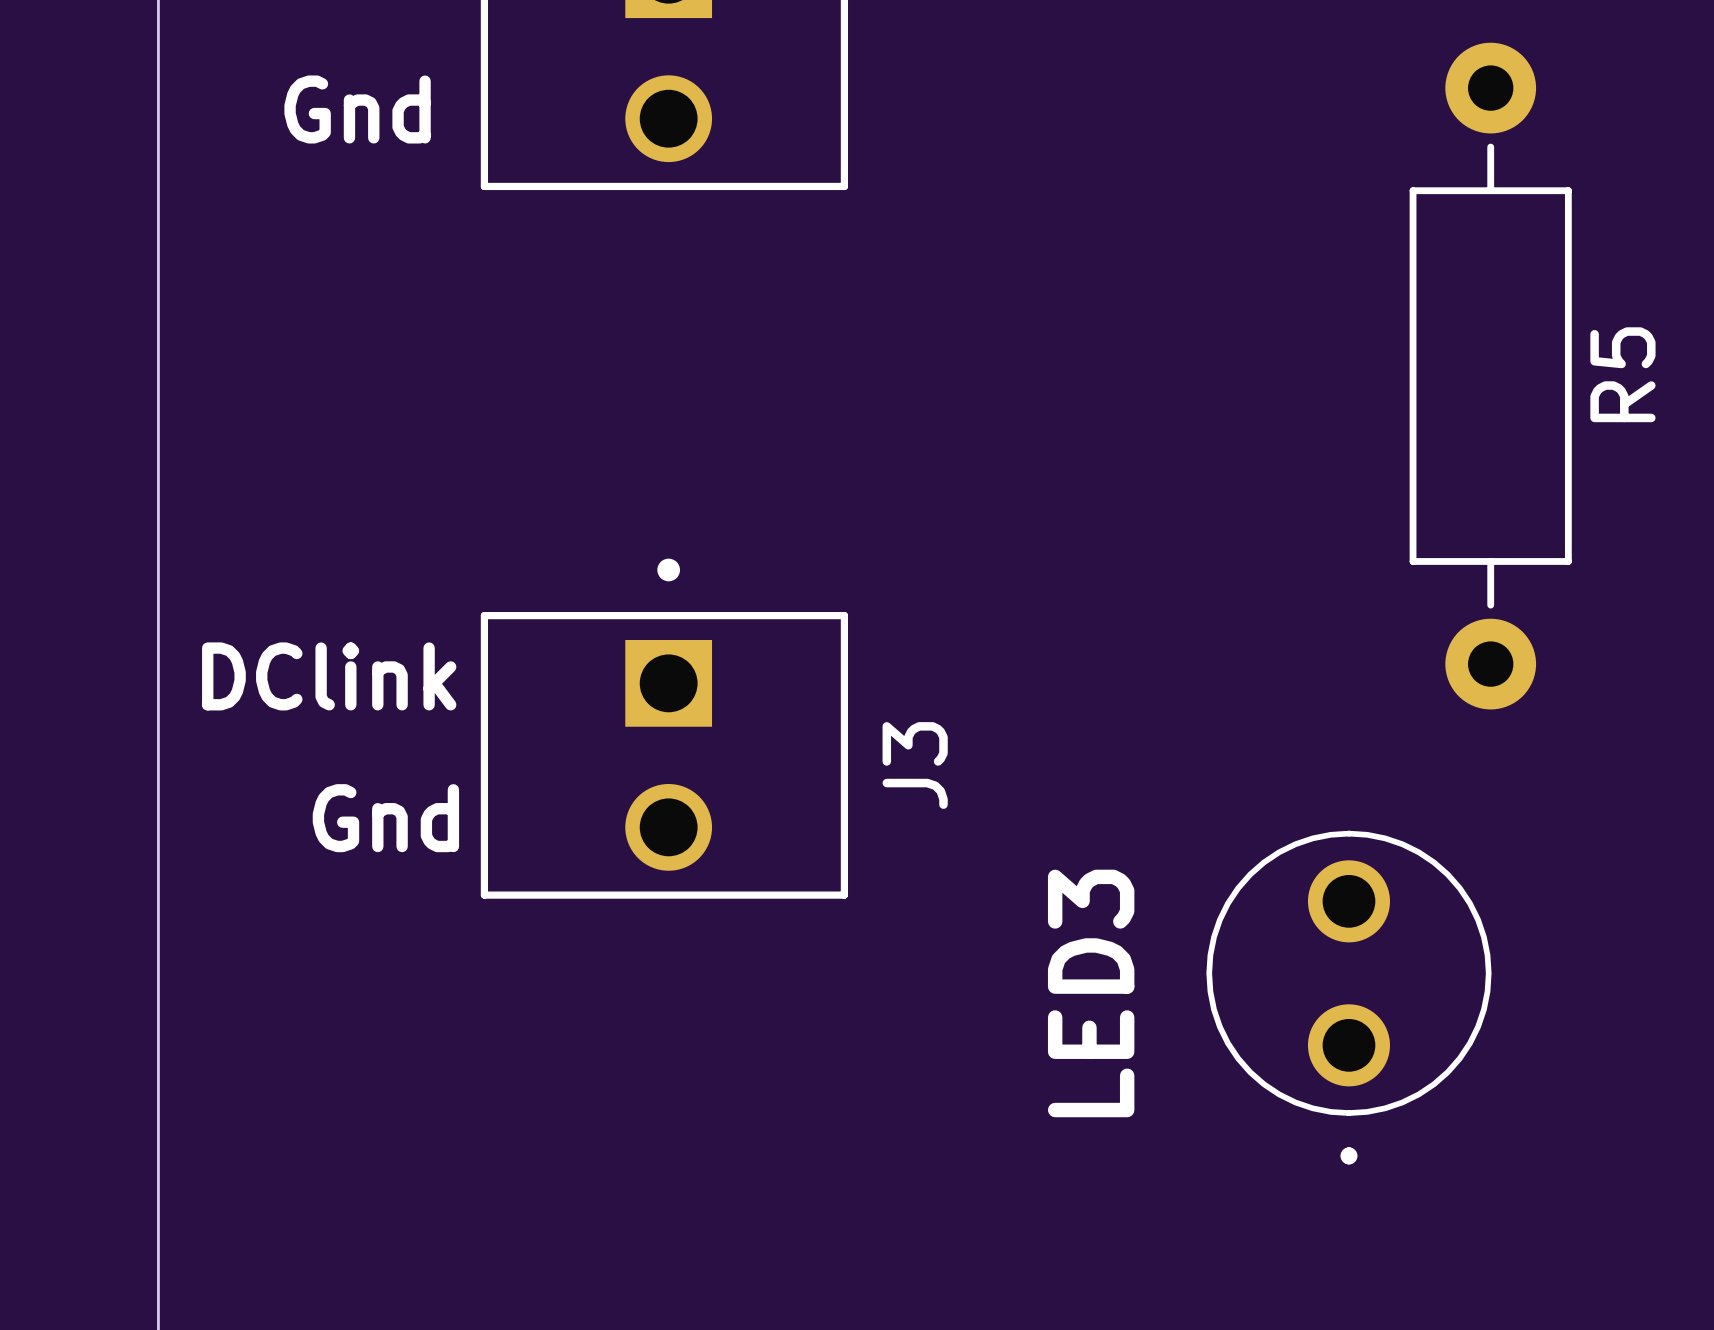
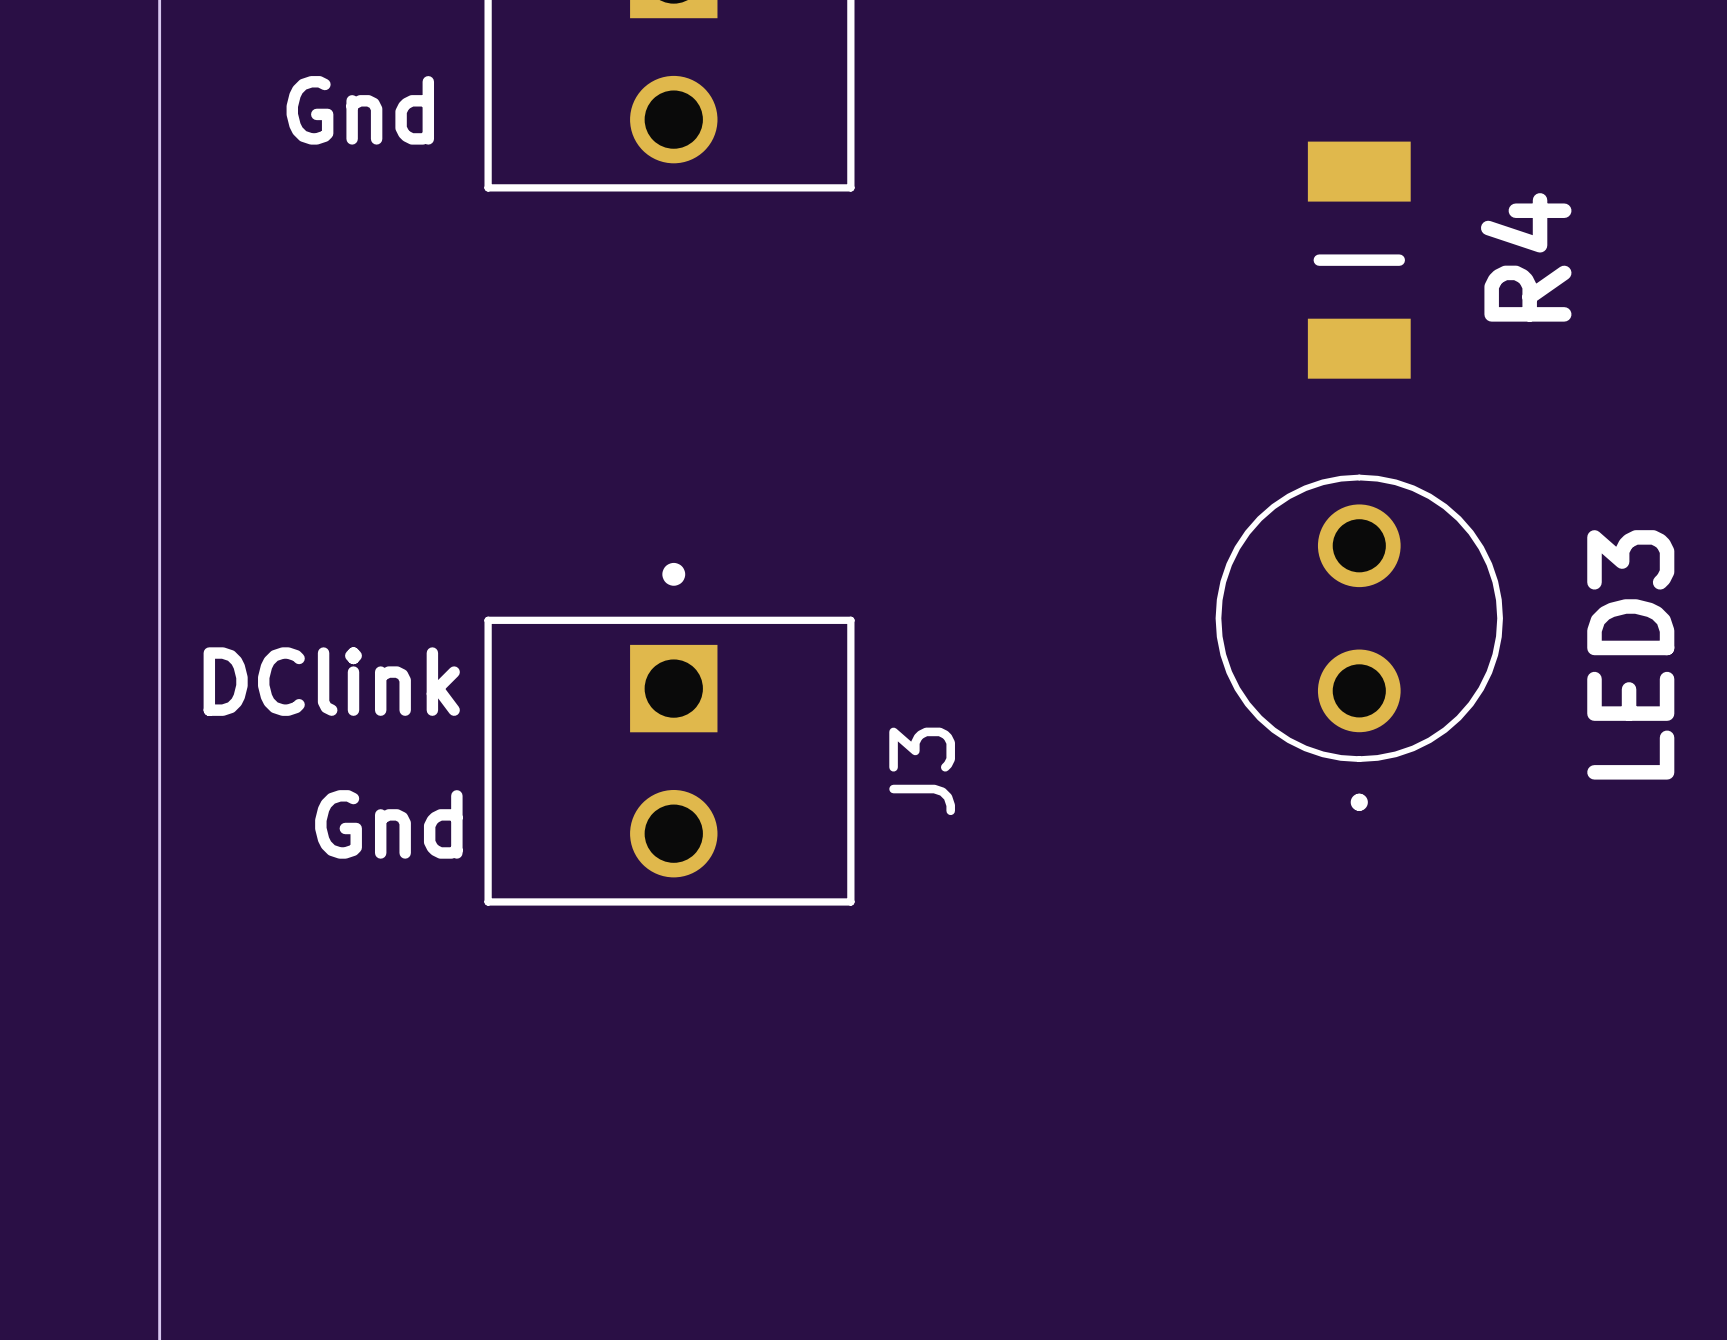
R4: none -> (1359, 260)
R5: (1490, 376) -> none
LED3 name position: LED3 (1091, 993) -> LED3 (1630, 654)
LED3 position: (1348, 997) -> (1359, 642)

